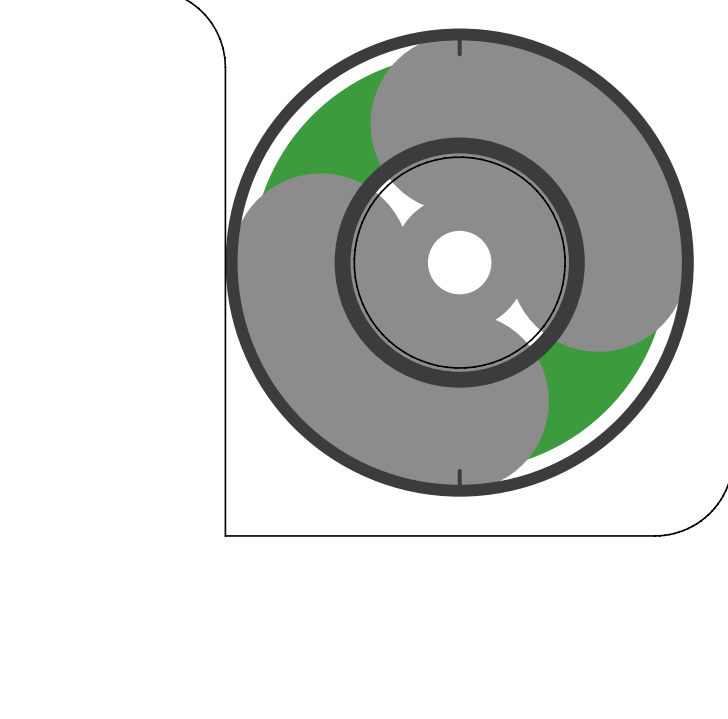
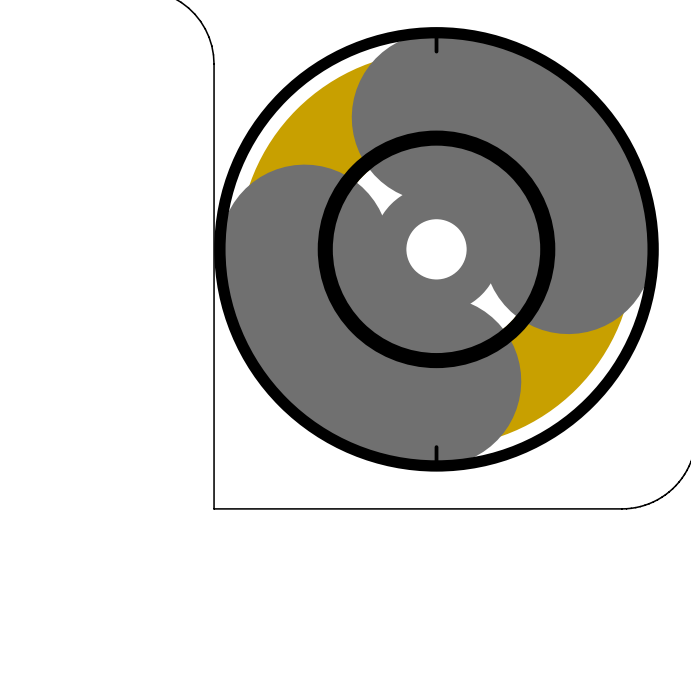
board edge: (454, 157) (435, 159) (418, 165) (402, 174) (381, 192) (370, 206) (361, 223) (355, 249) (354, 268) (356, 286) (366, 312) (376, 327) (389, 340) (403, 352) (420, 360) (437, 365) (465, 367) (483, 365) (509, 355) (524, 345) (538, 333) (549, 318) (557, 302) (562, 284) (564, 257) (562, 238) (552, 213) (542, 197) (530, 184) (515, 173) (499, 164) (481, 159) (454, 157) -> none

